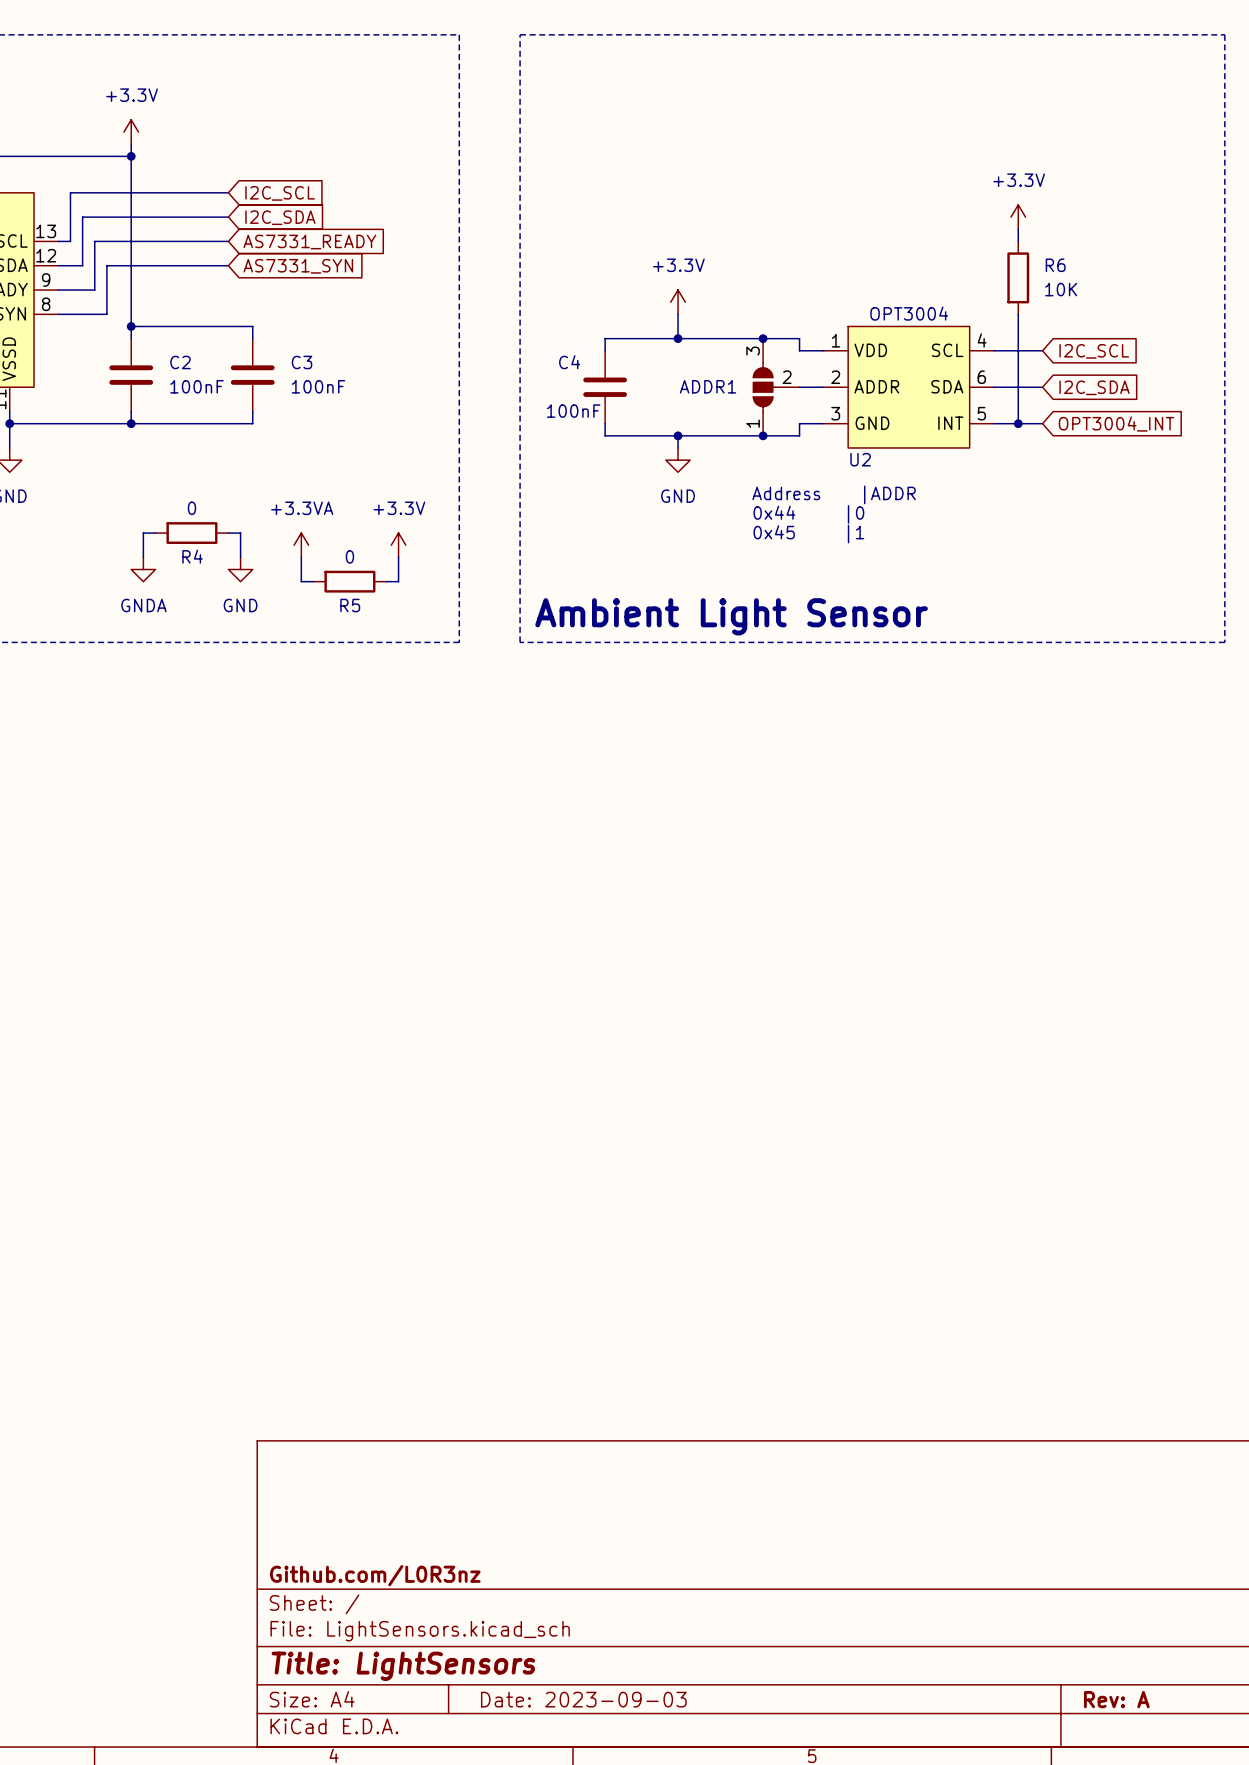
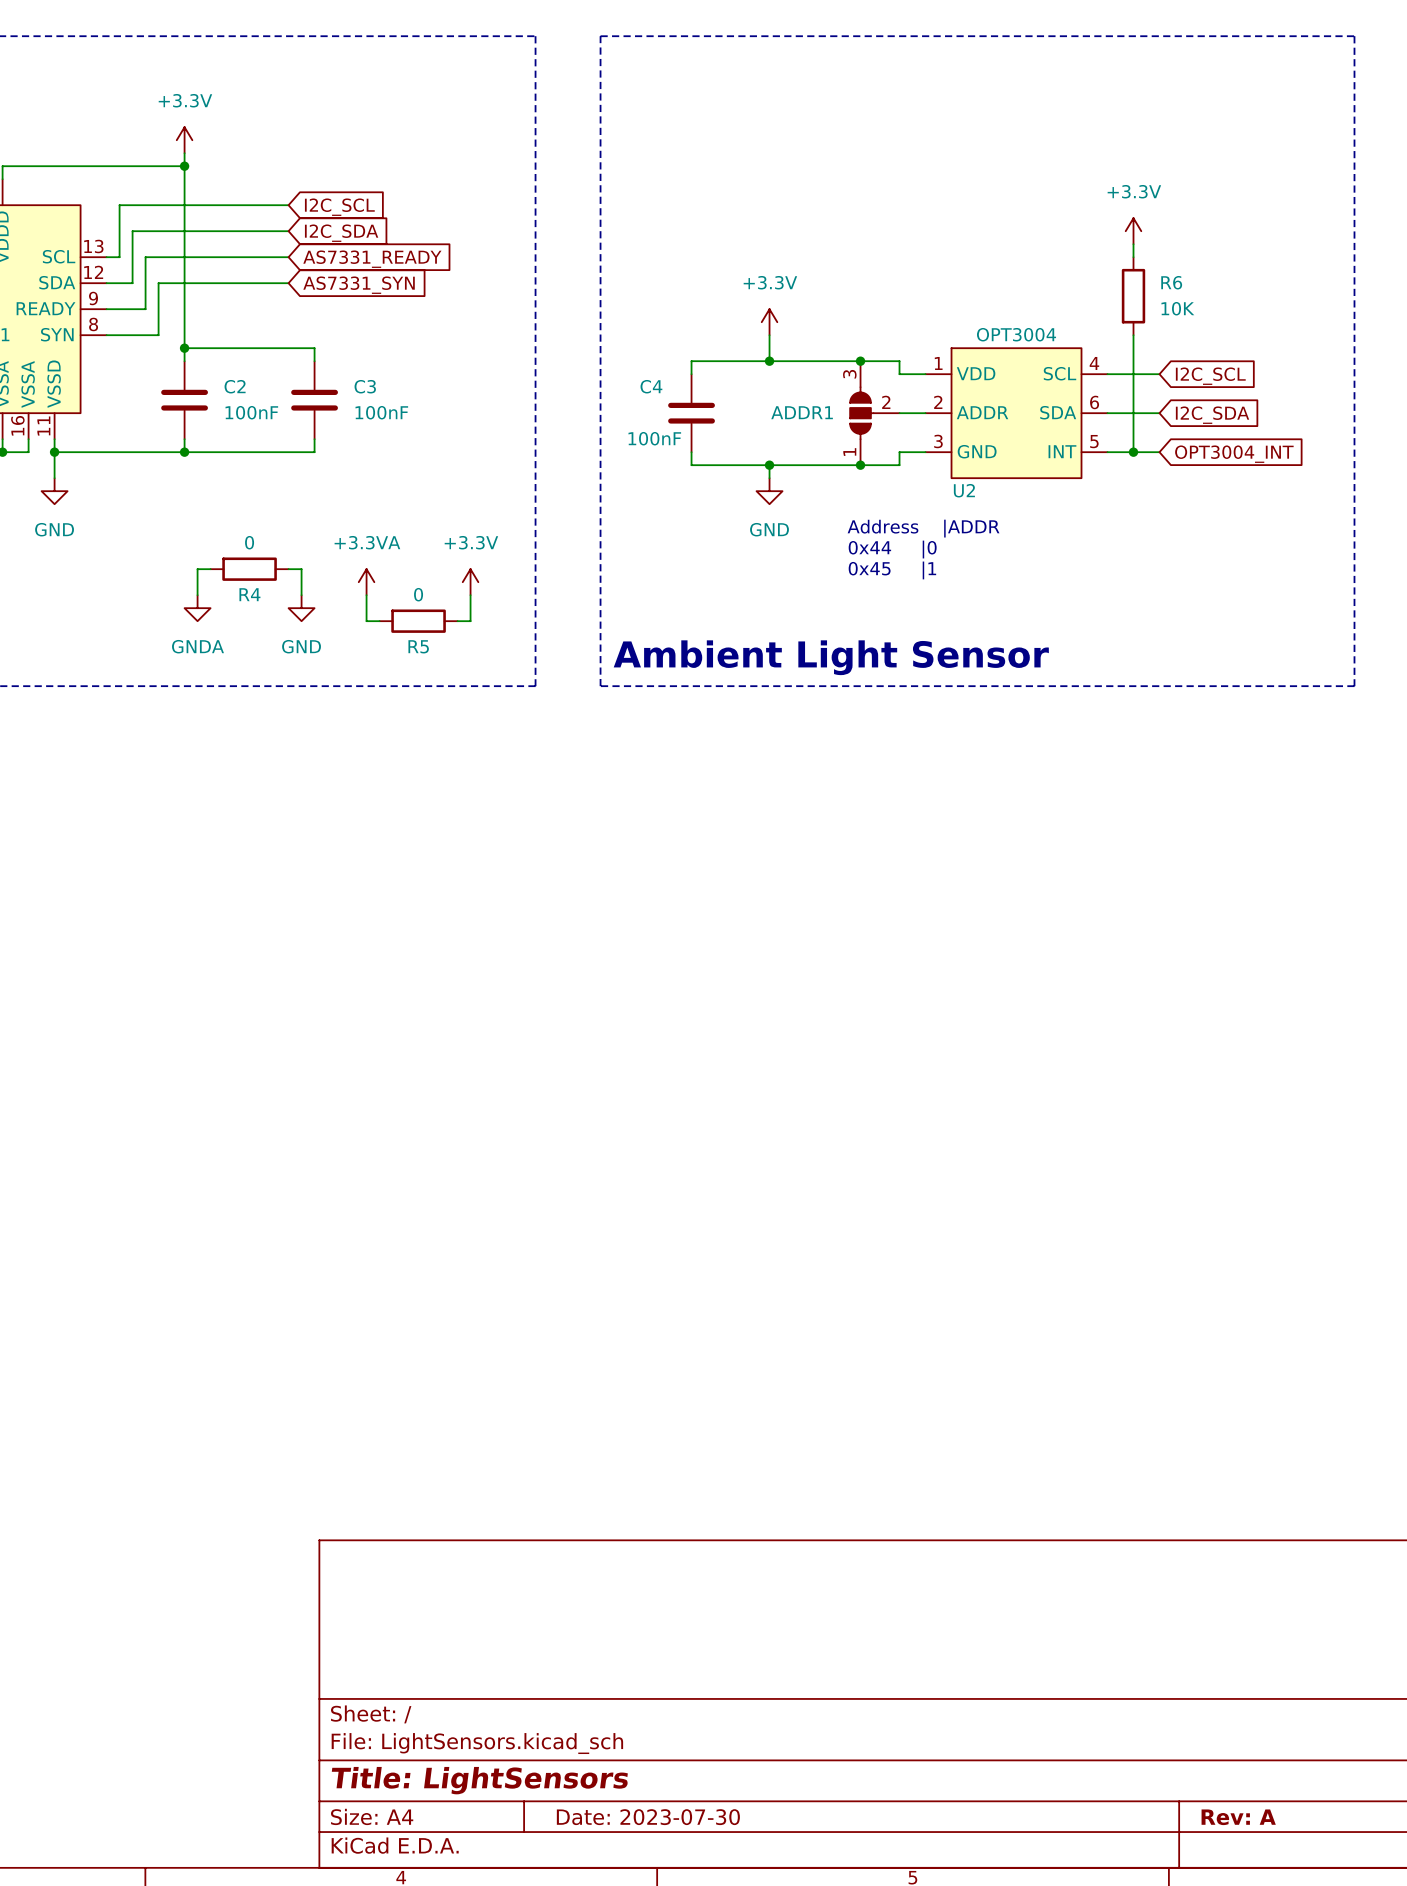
title block: Github.com/L0R3nz (375, 1575) -> none
title block: Date: 2023-09-03 (583, 1699) -> Date: 2023-07-30 (648, 1817)

